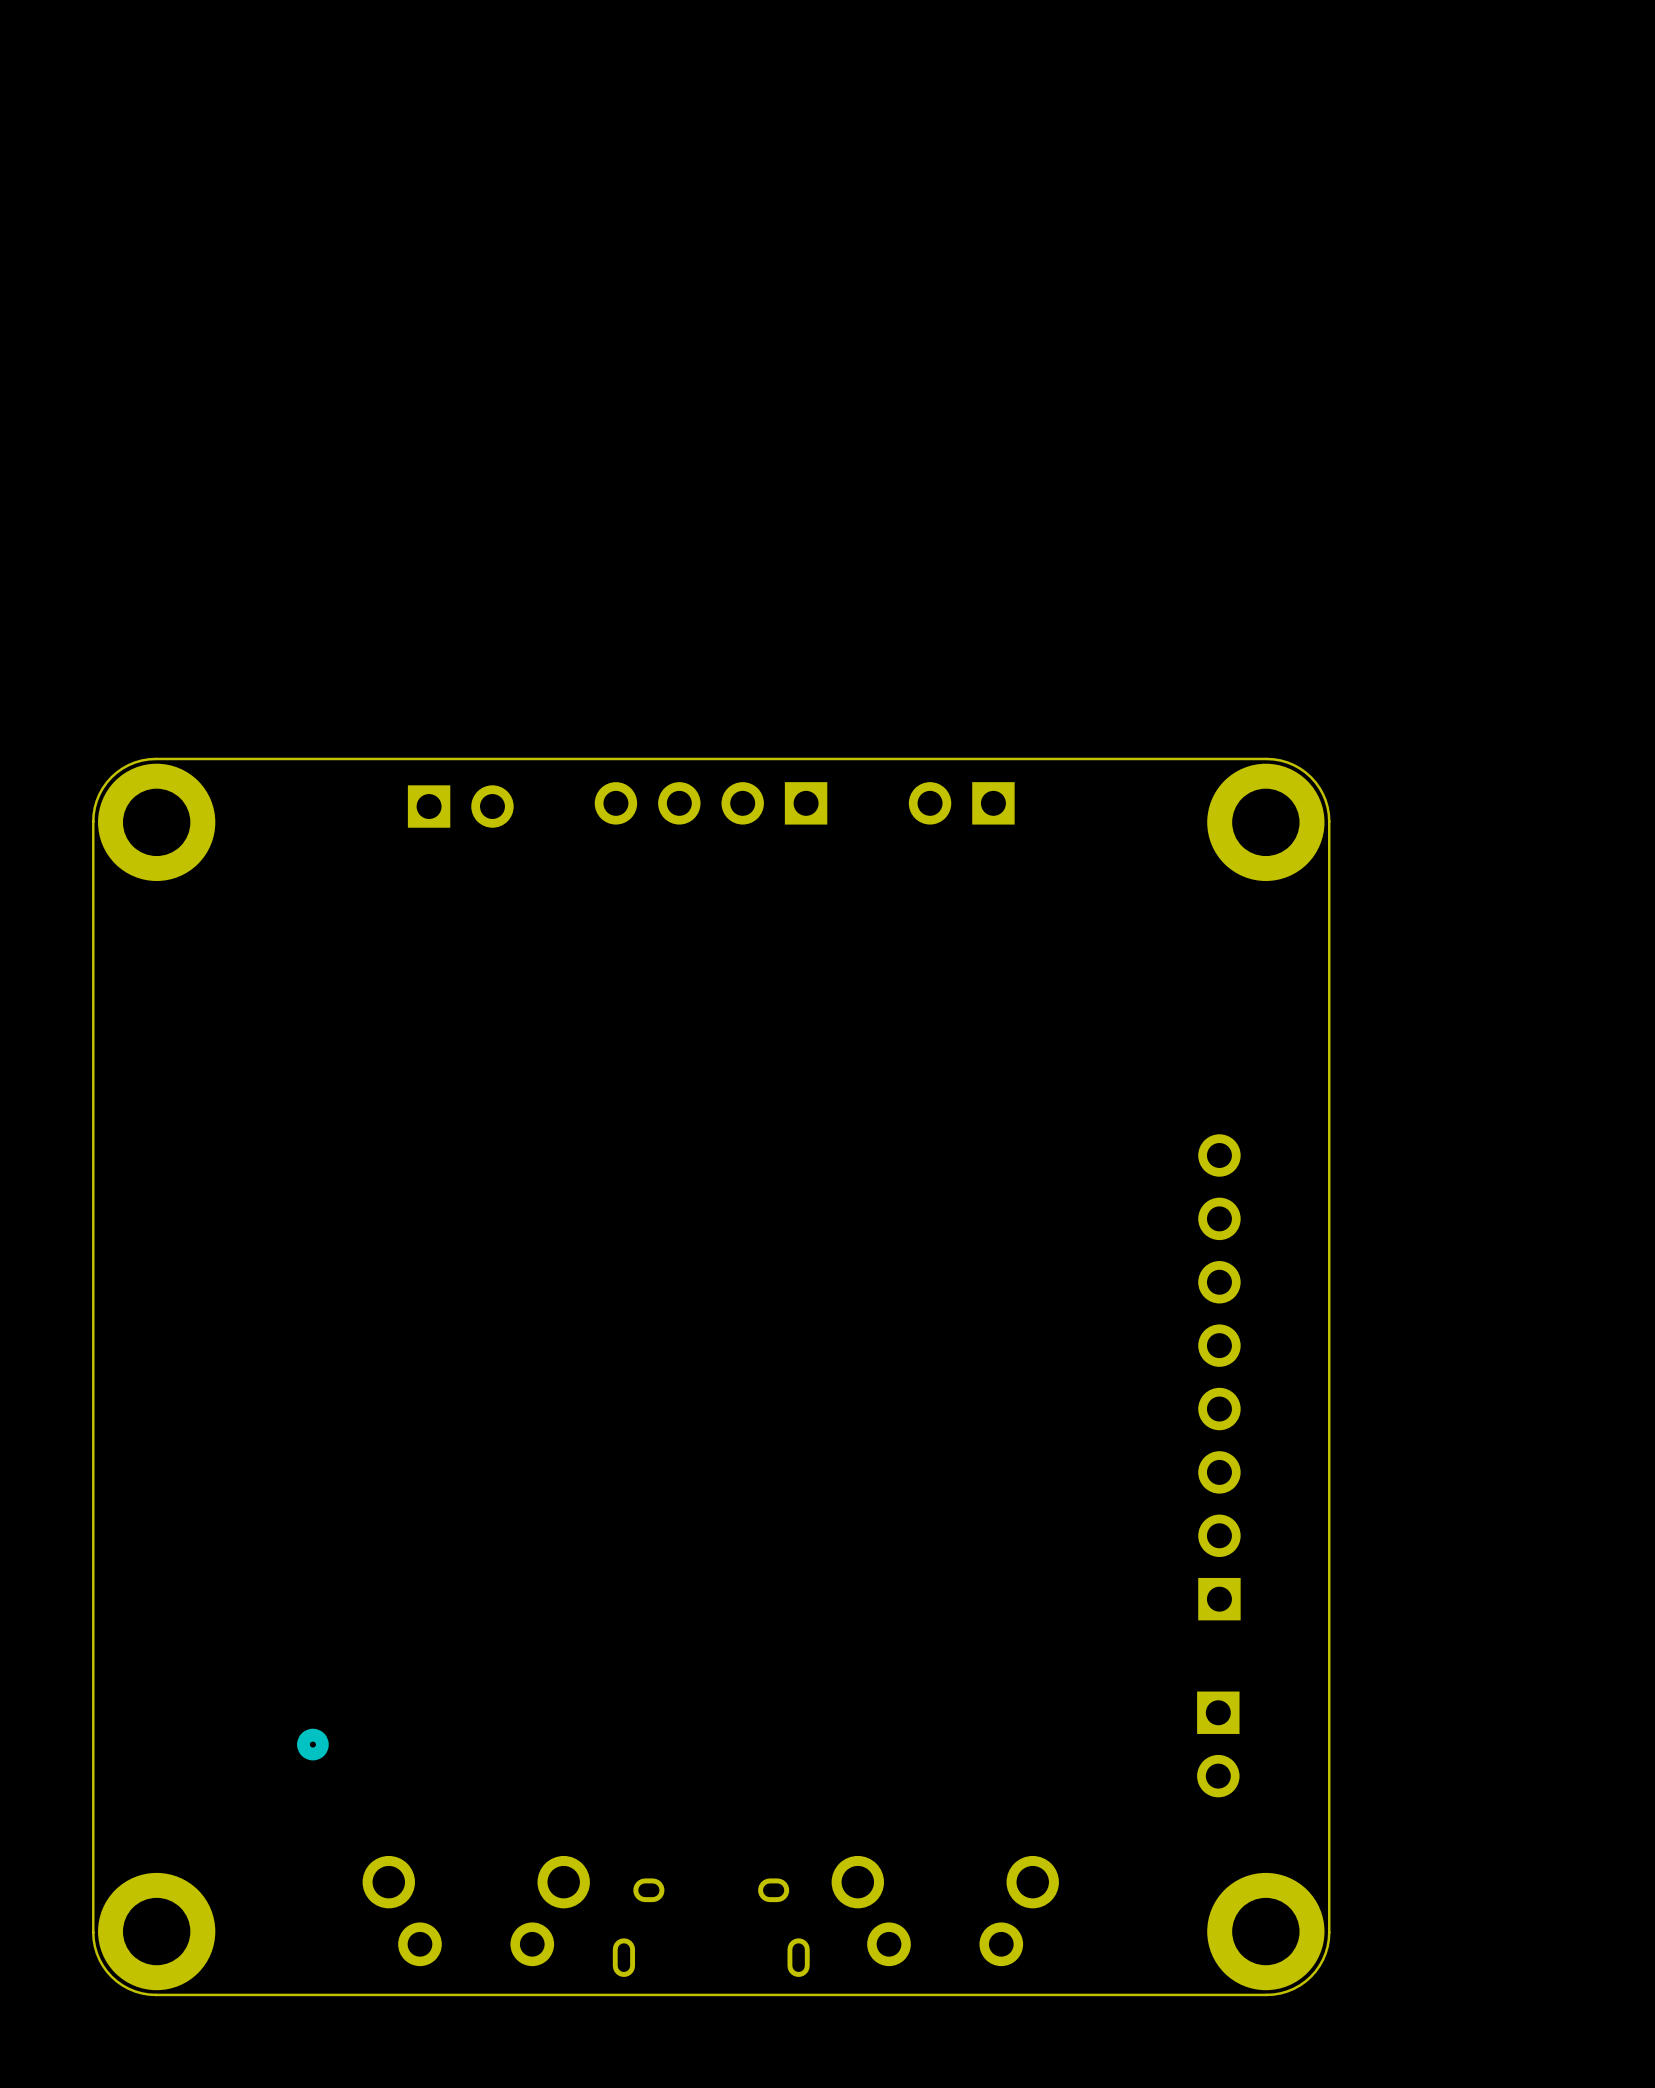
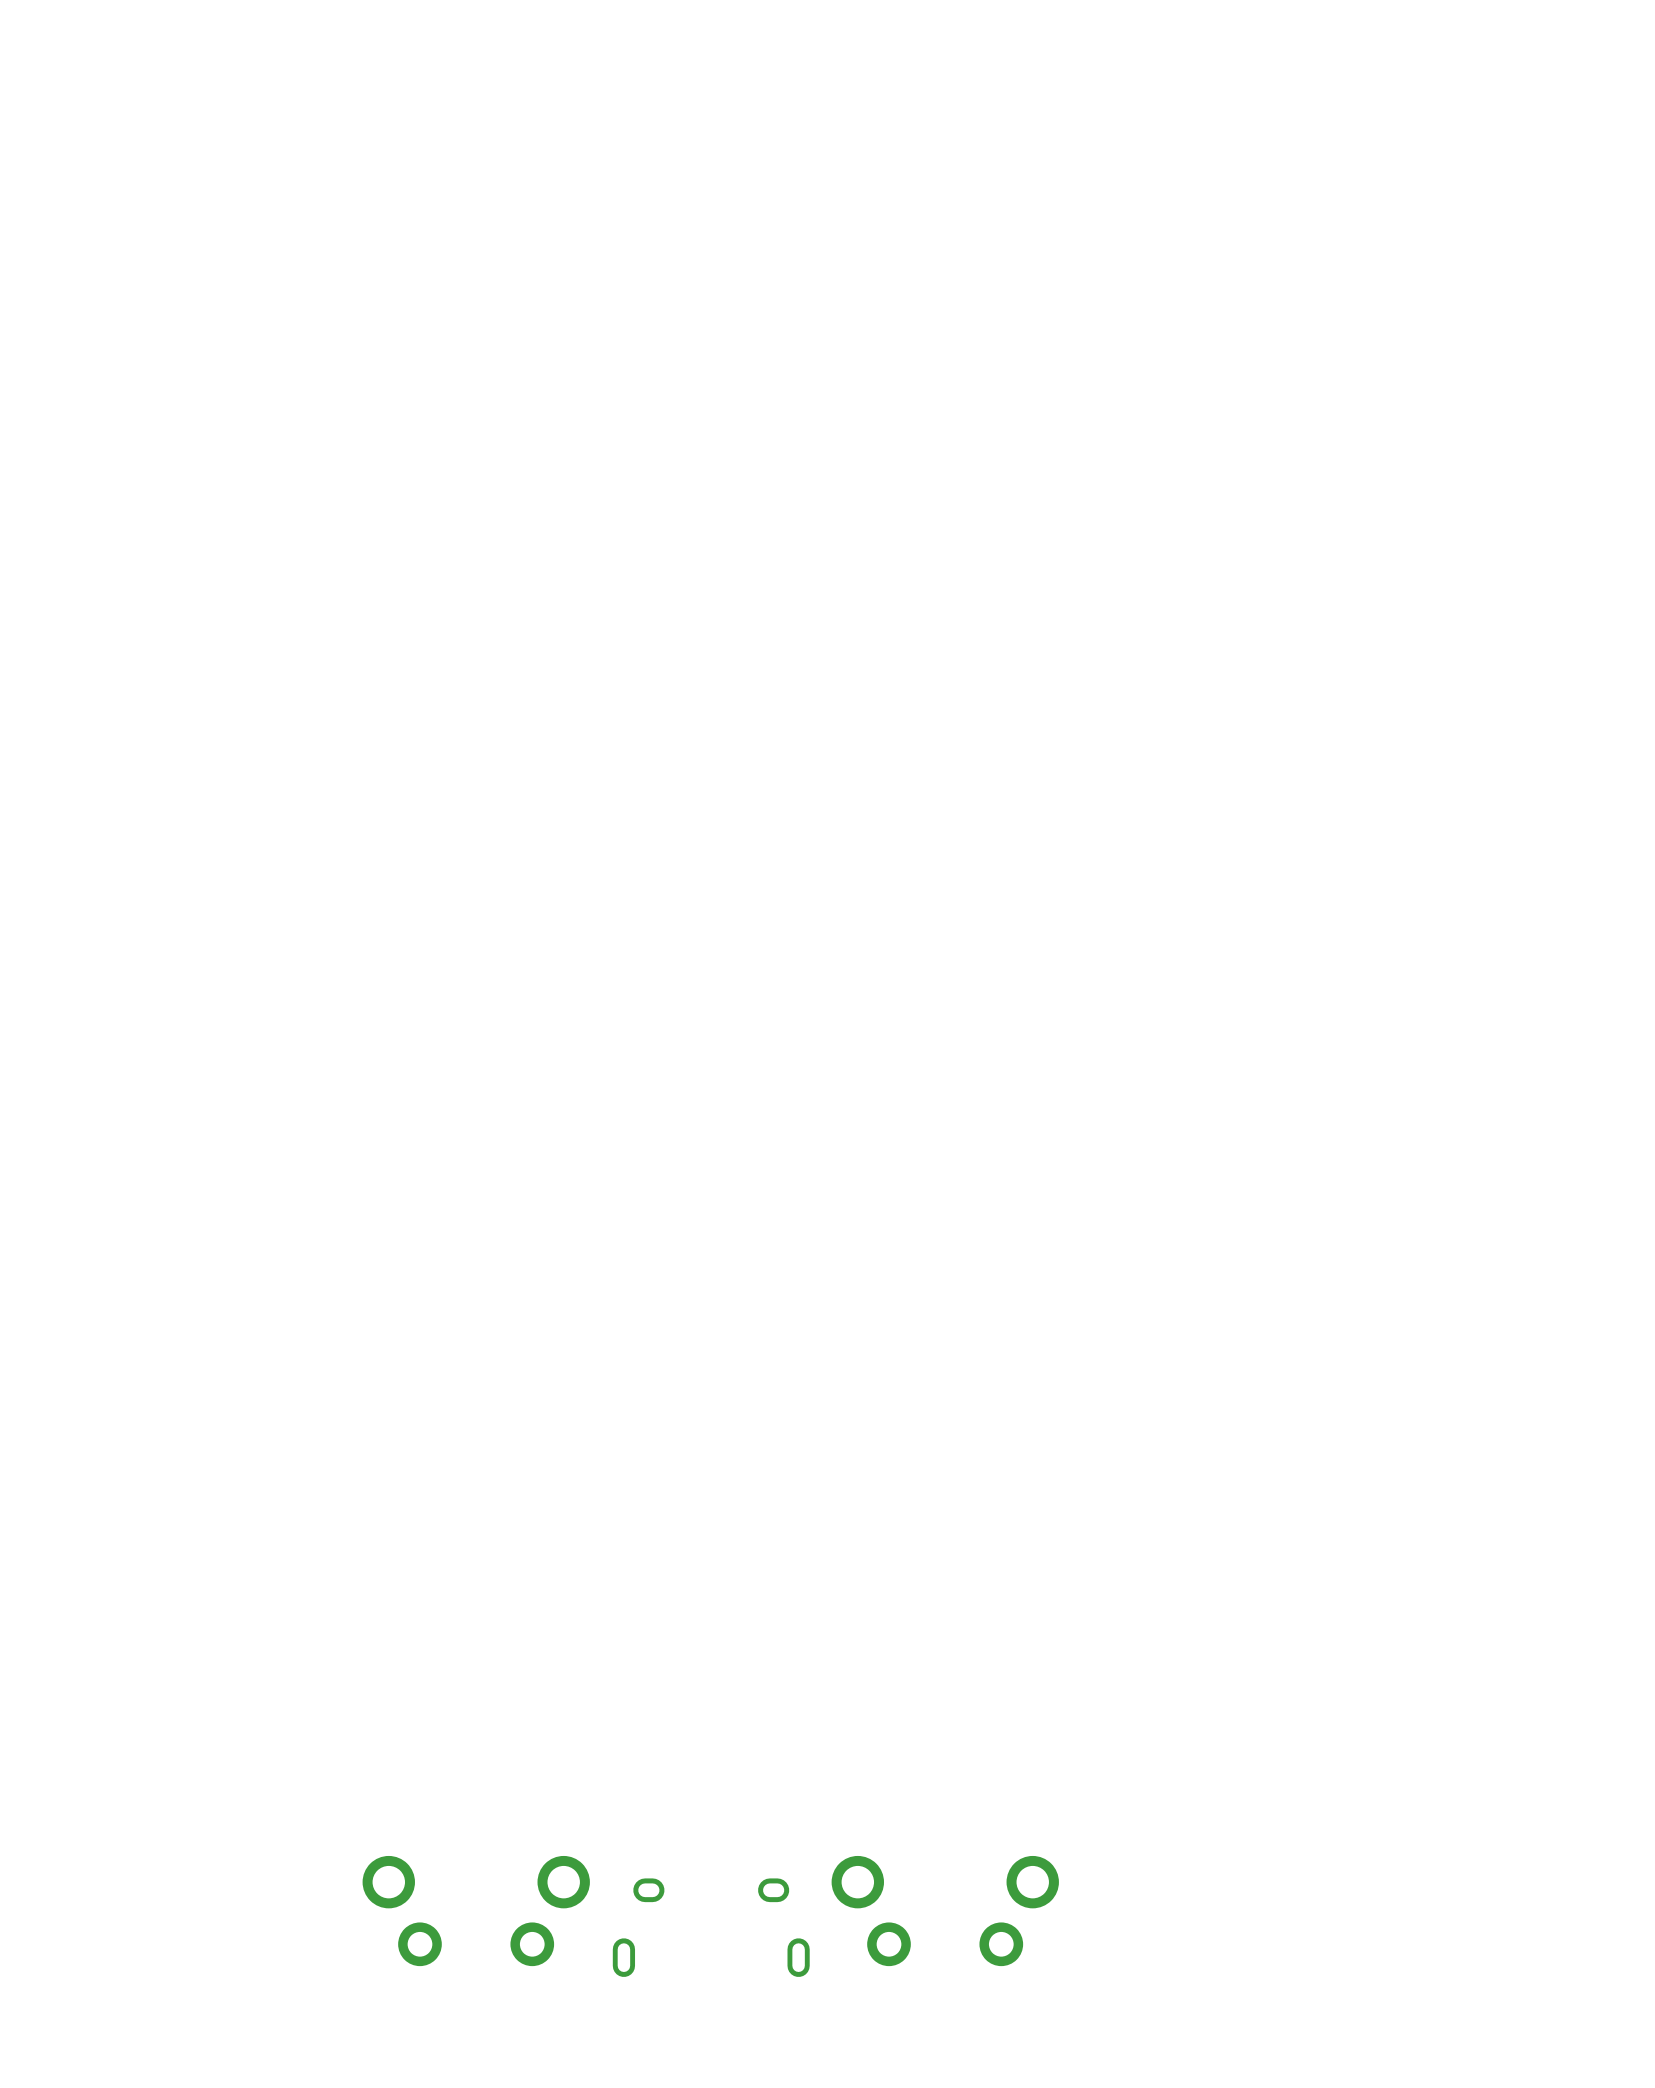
board edge: (1266, 758) (155, 758) (135, 762) (122, 768) (111, 777) (99, 794) (94, 807) (93, 821) (93, 1932) (96, 1953) (102, 1965) (111, 1976) (122, 1985) (135, 1991) (155, 1994) (1266, 1994) (1287, 1991) (1300, 1985) (1310, 1976) (1323, 1959) (1327, 1946) (1329, 1932) (1329, 821) (1325, 800) (1319, 788) (1310, 777) (1300, 768) (1287, 762) (1266, 758) -> none
part: (711, 803) -> none
part: (961, 803) -> none
part: (460, 806) -> none
part: (156, 822) -> none
part: (1265, 822) -> none
part: (1219, 1377) -> none
part: (312, 1744) -> none
part: (1218, 1744) -> none
part: (156, 1931) -> none
part: (1265, 1931) -> none

